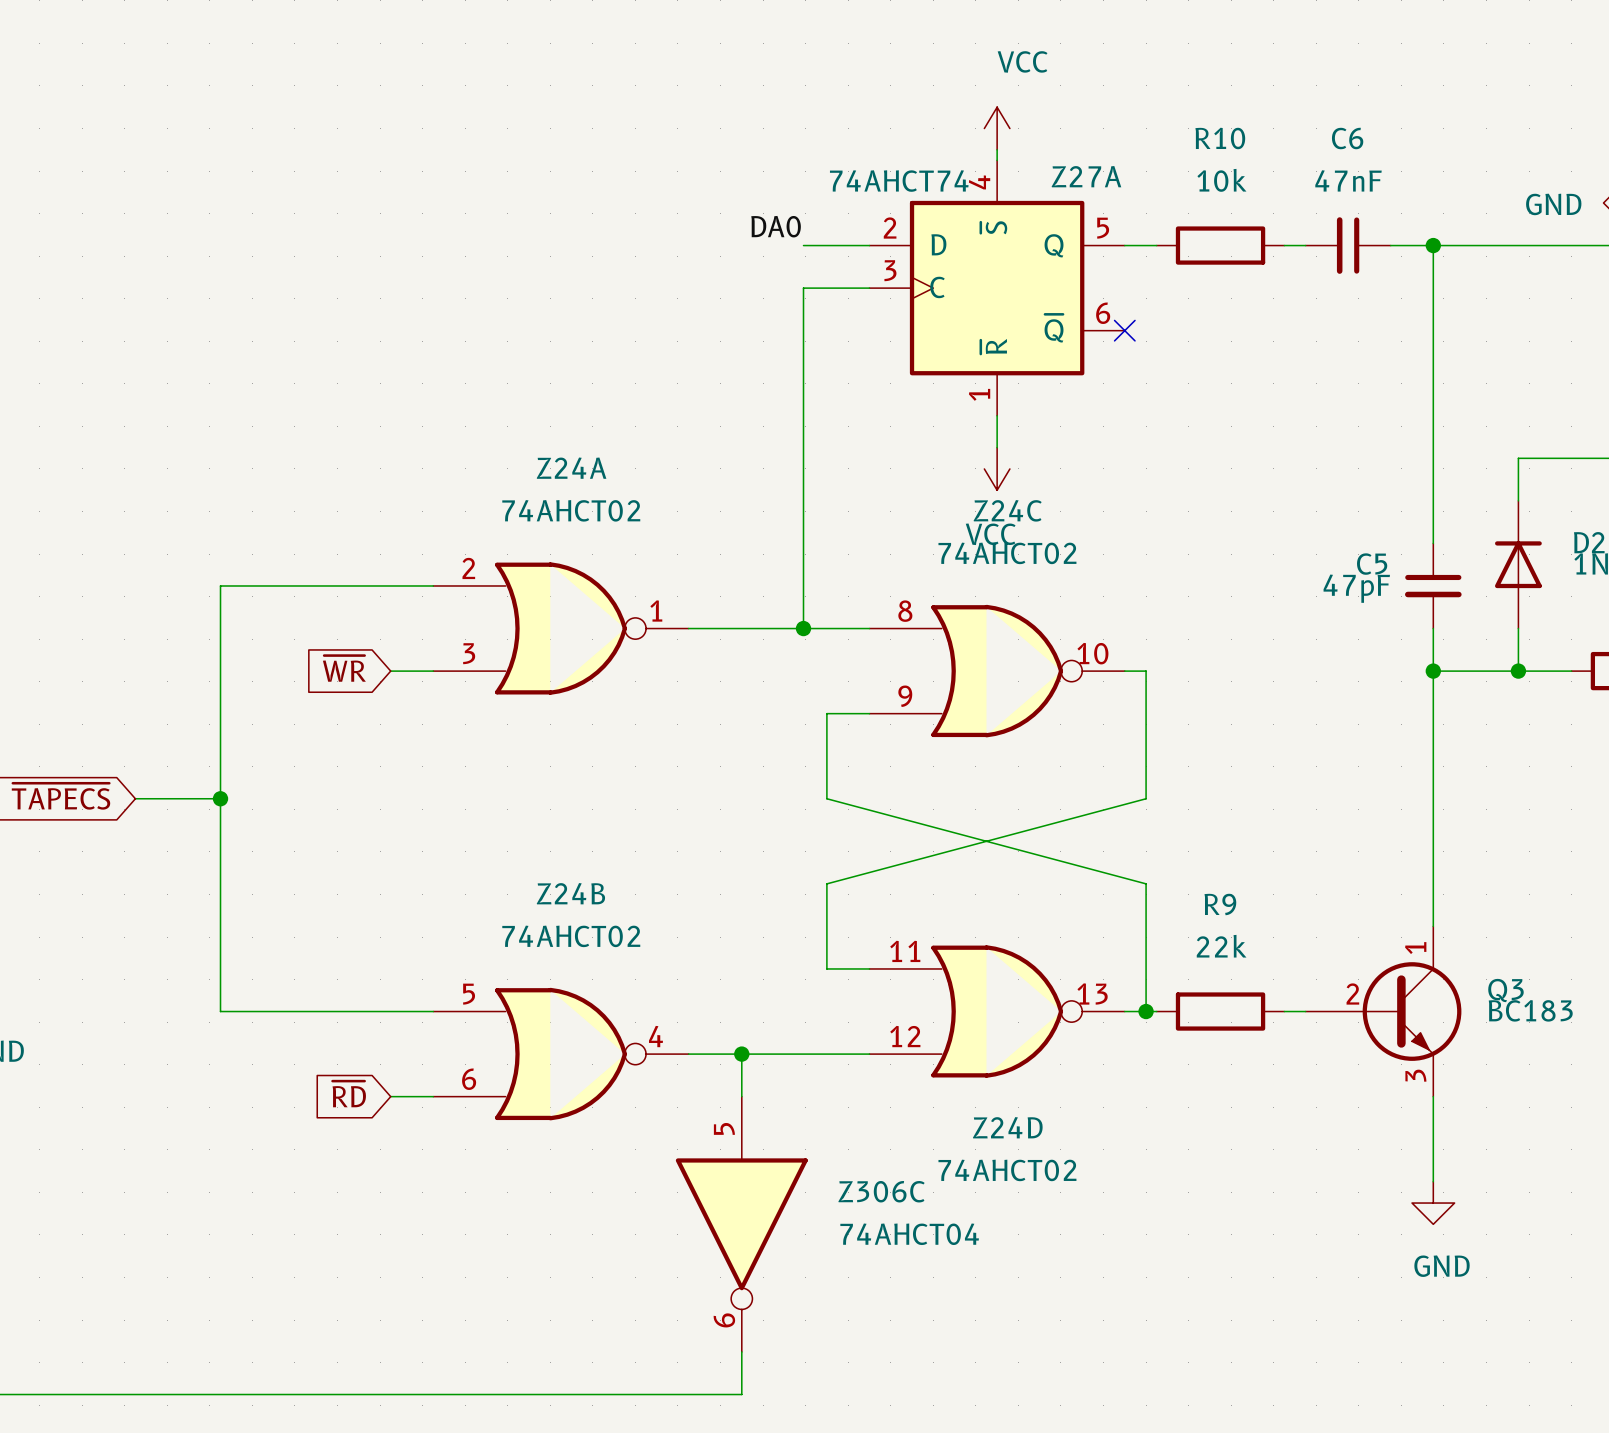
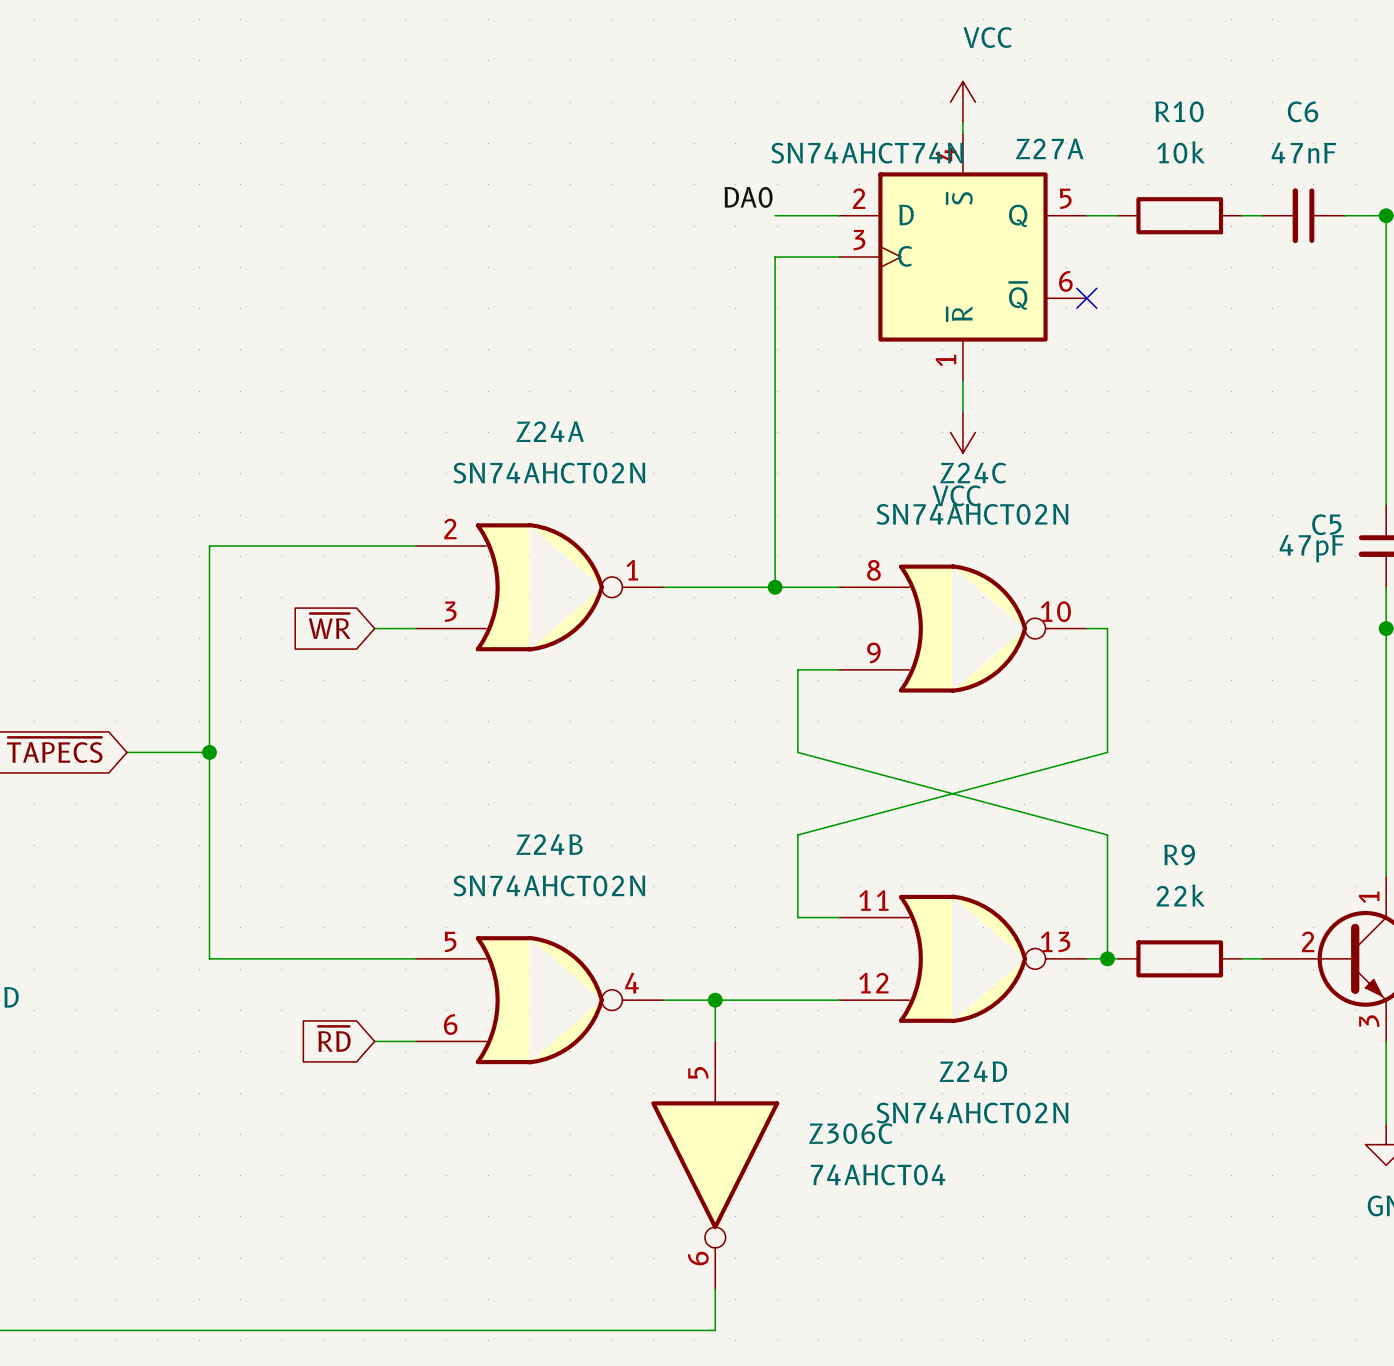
Z27A value: 74AHCT74 (899, 181) -> SN74AHCT74N (867, 153)
Z24A value: 74AHCT02 (571, 510) -> SN74AHCT02N (549, 473)
Z24C value: 74AHCT02 (1007, 553) -> SN74AHCT02N (972, 514)
Z24B value: 74AHCT02 (571, 936) -> SN74AHCT02N (549, 885)
Z24D value: 74AHCT02 (1007, 1170) -> SN74AHCT02N (972, 1113)

